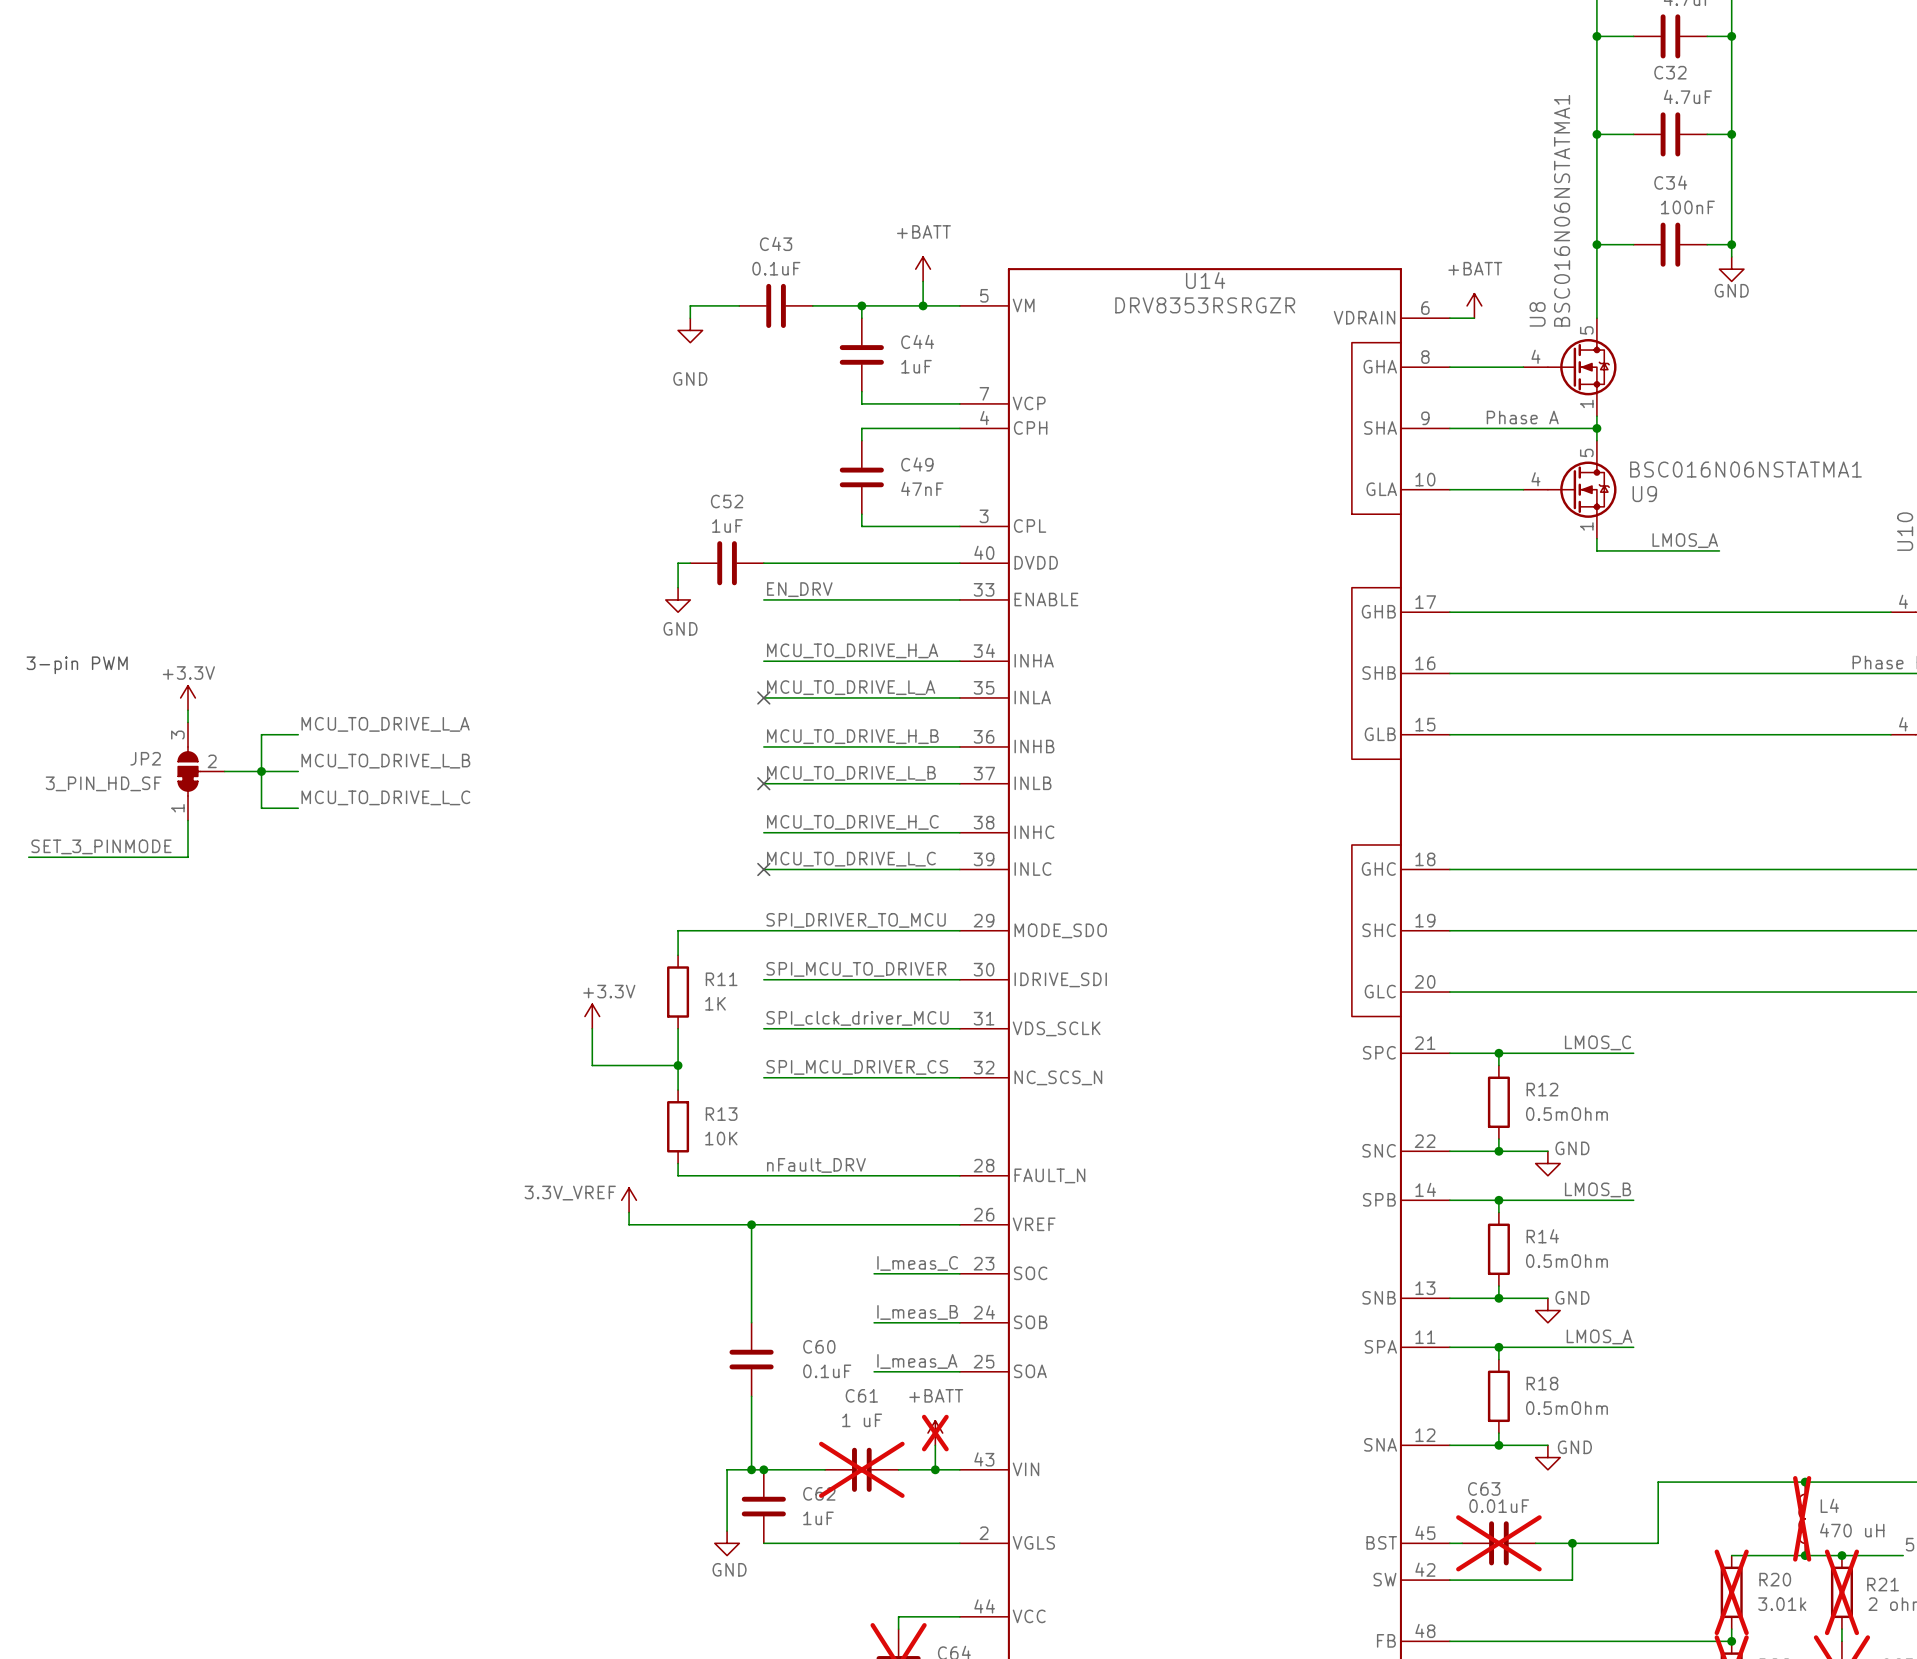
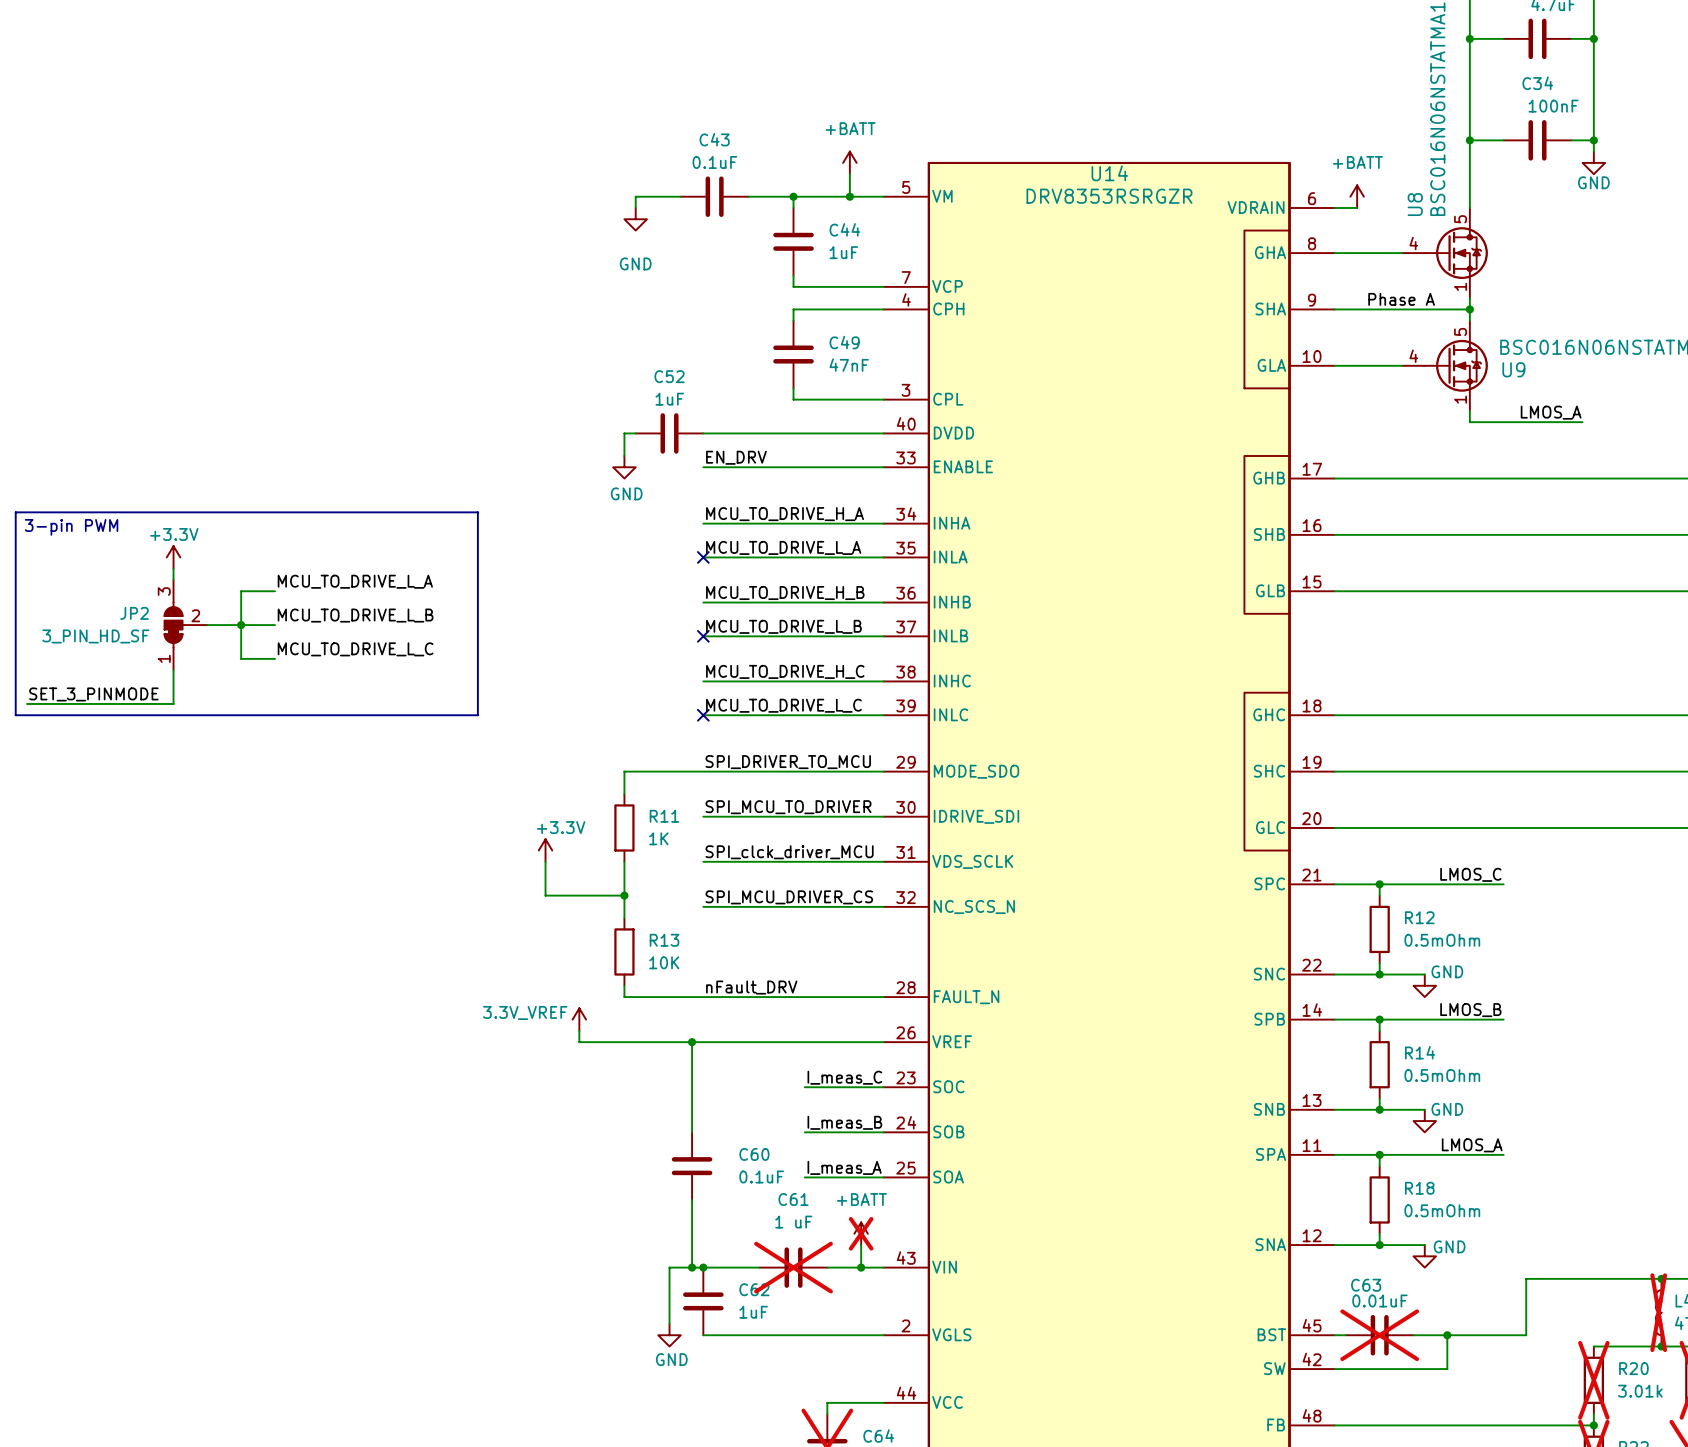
line: none -> (15, 512) (477, 512) (477, 715) (15, 715) (15, 512)

